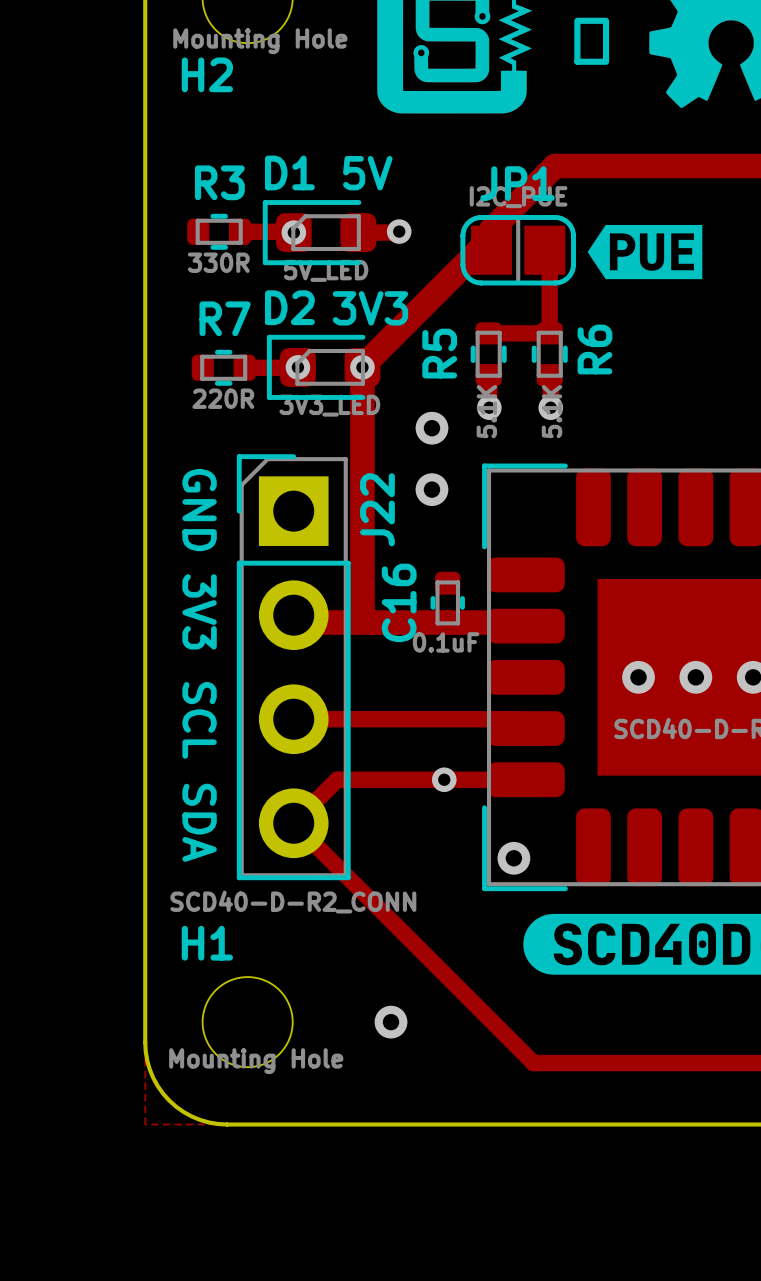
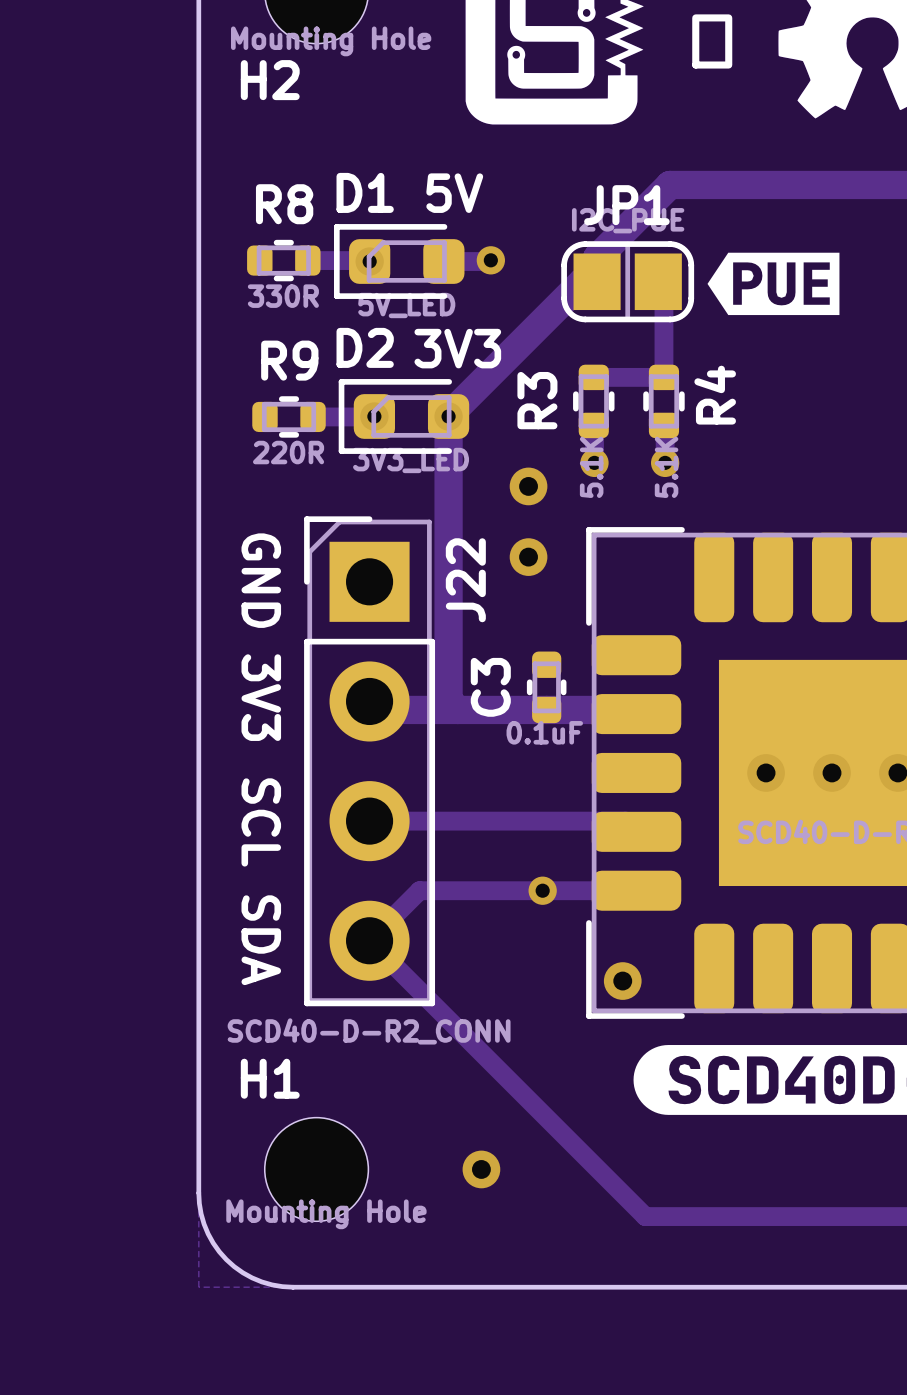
R3 name: R3 (219, 182) -> R8 (284, 204)
R7 name: R7 (225, 318) -> R9 (289, 360)
R6 name: R6 (594, 349) -> R4 (715, 395)
R5 name: R5 (439, 353) -> R3 (537, 400)
C16 name: C16 (399, 602) -> C3 (490, 687)

